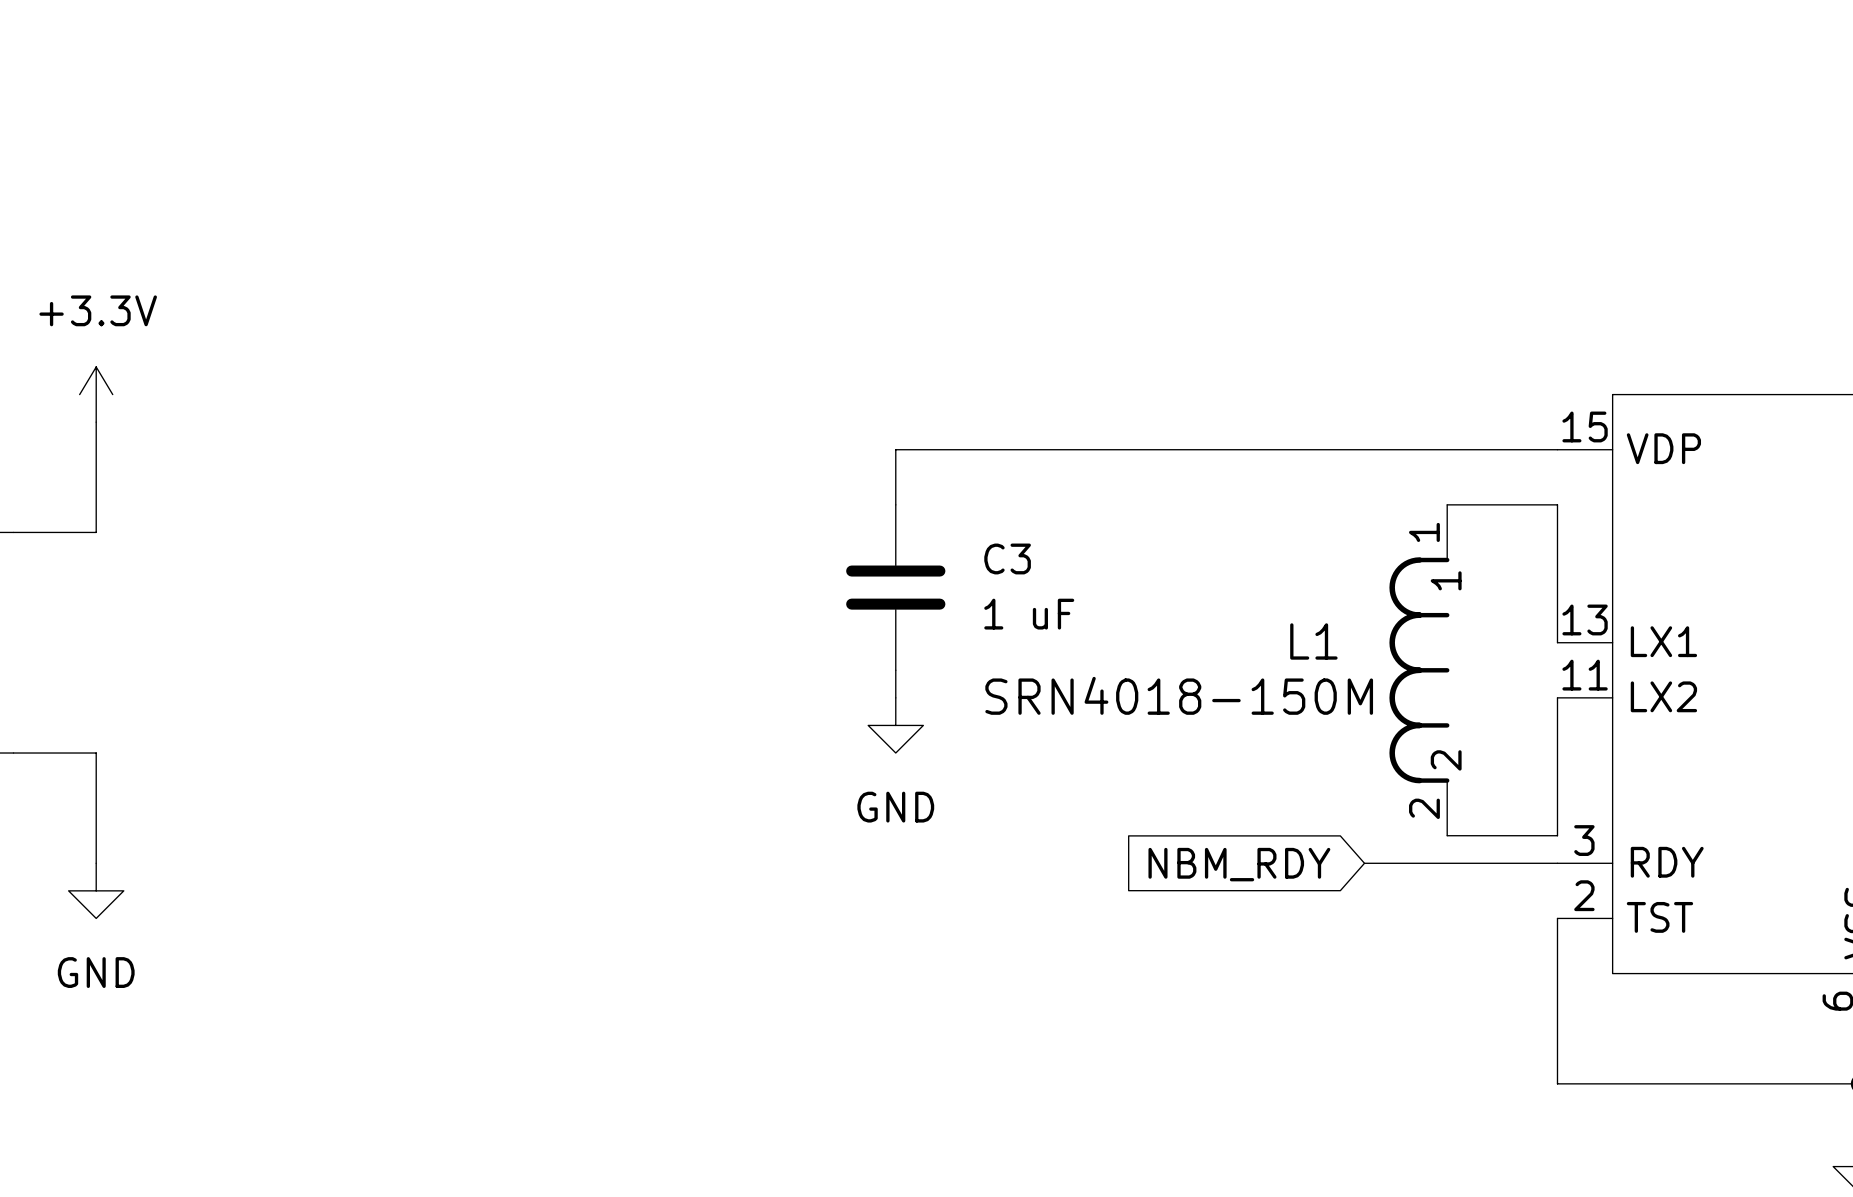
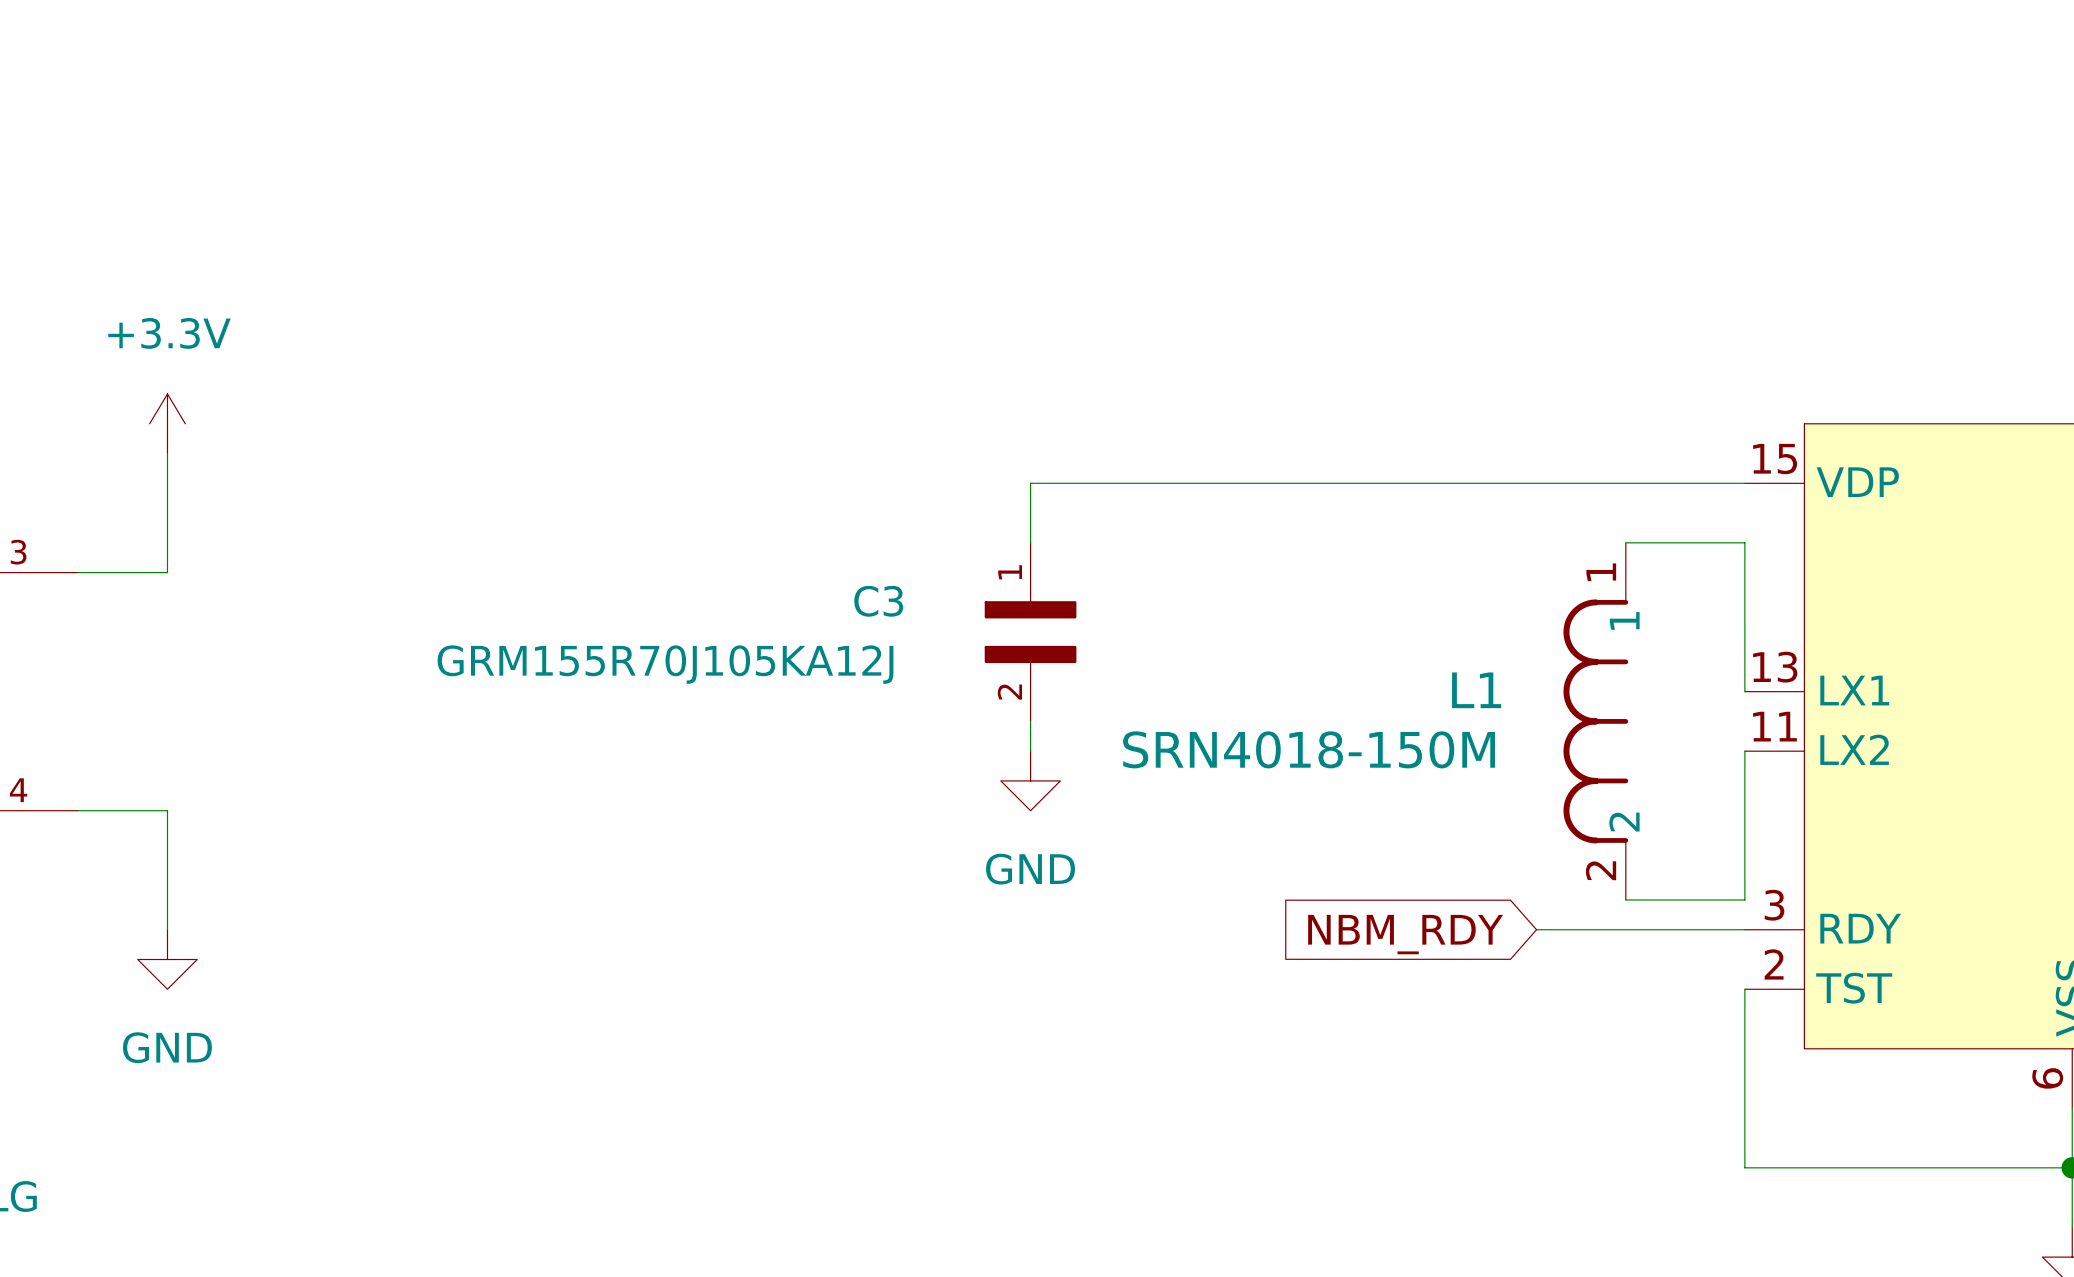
C3 symbol: [846, 504, 946, 671] -> [984, 542, 1077, 722]
C3 name position: C3 (1007, 558) -> C3 (878, 601)
C3 value: 1 uF (1029, 614) -> GRM155R70J105KA12J (665, 664)

